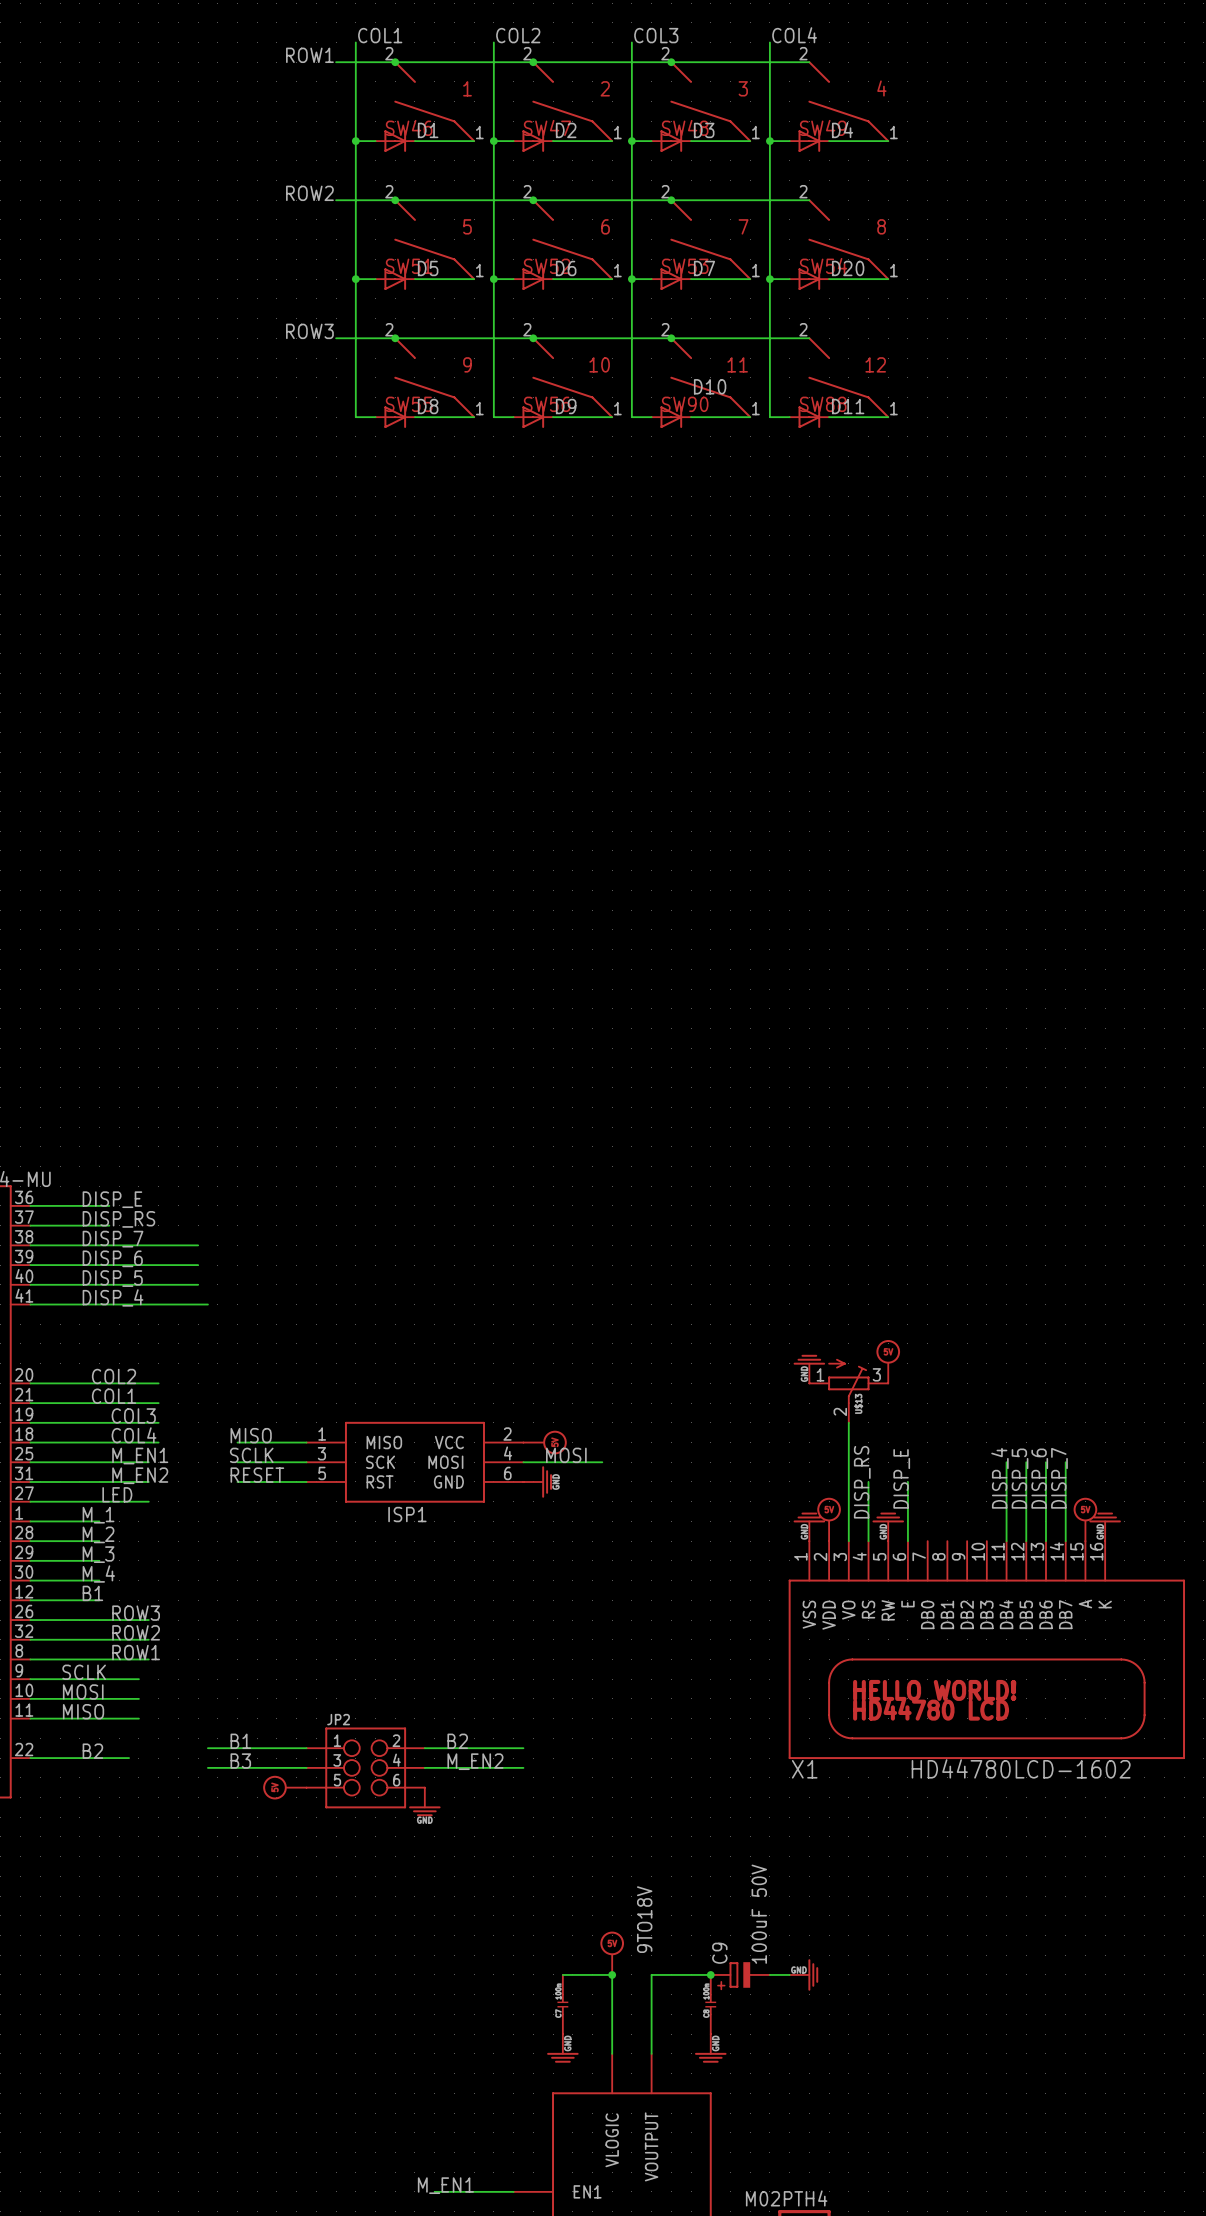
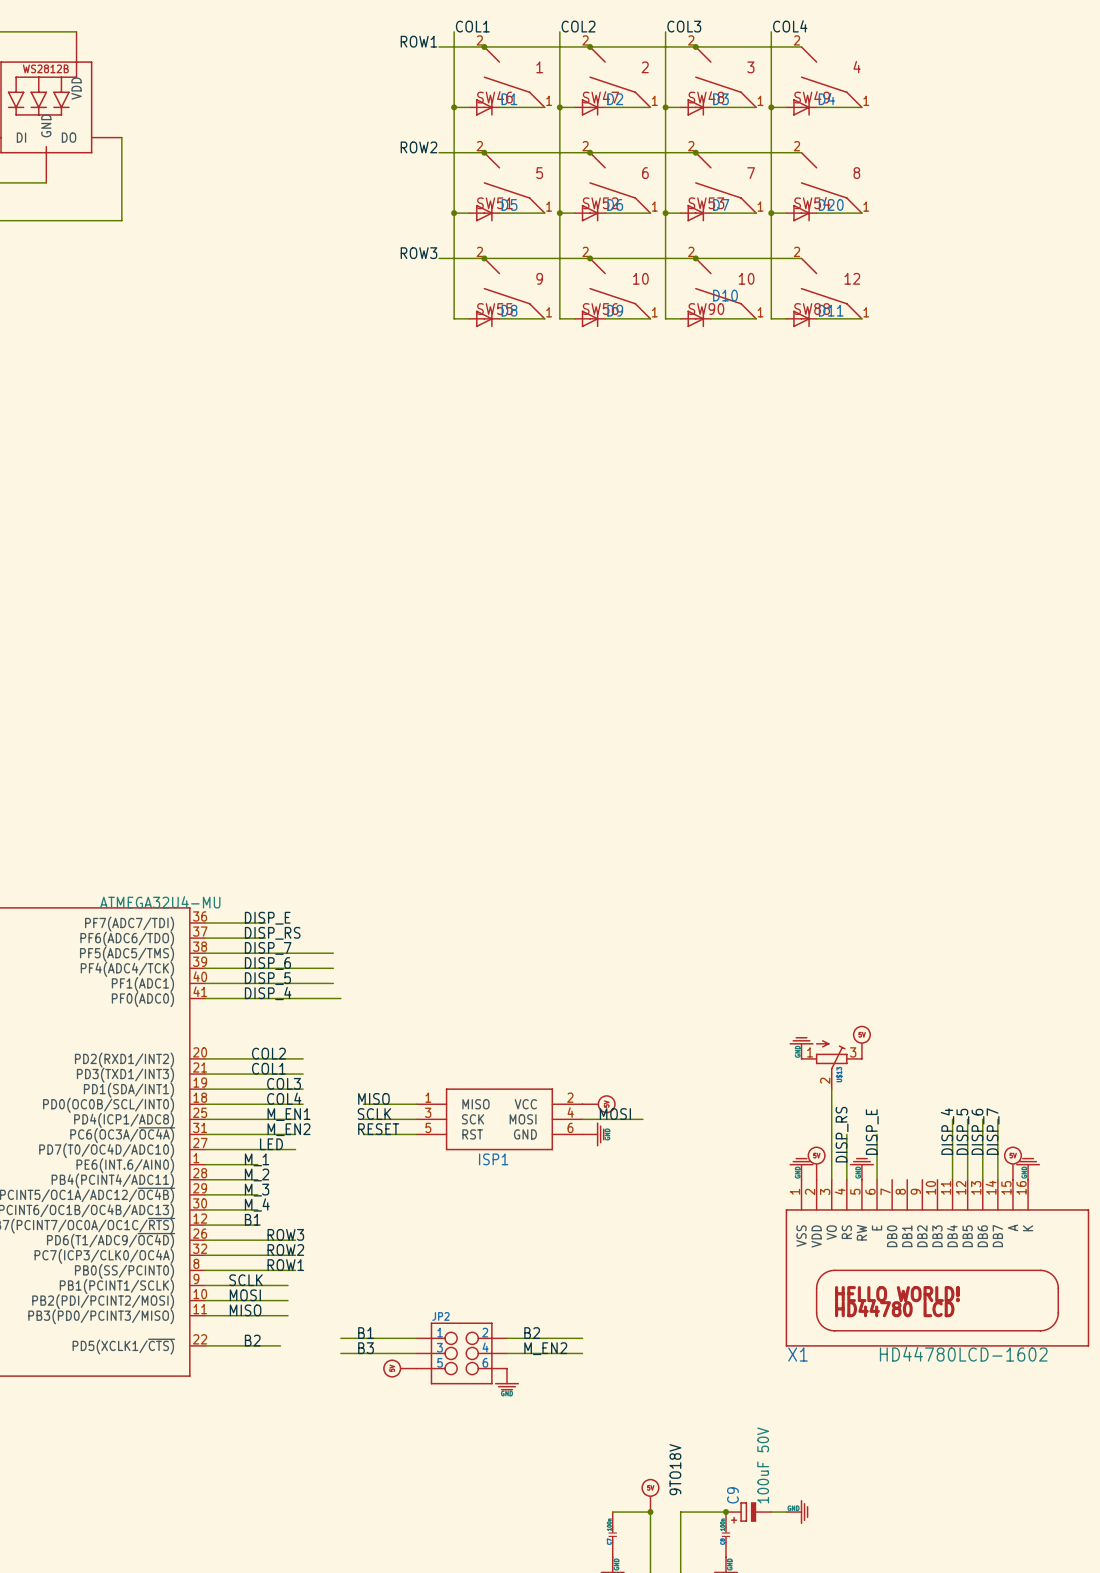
SW90 value: 11 (737, 364) -> 10 (746, 278)

